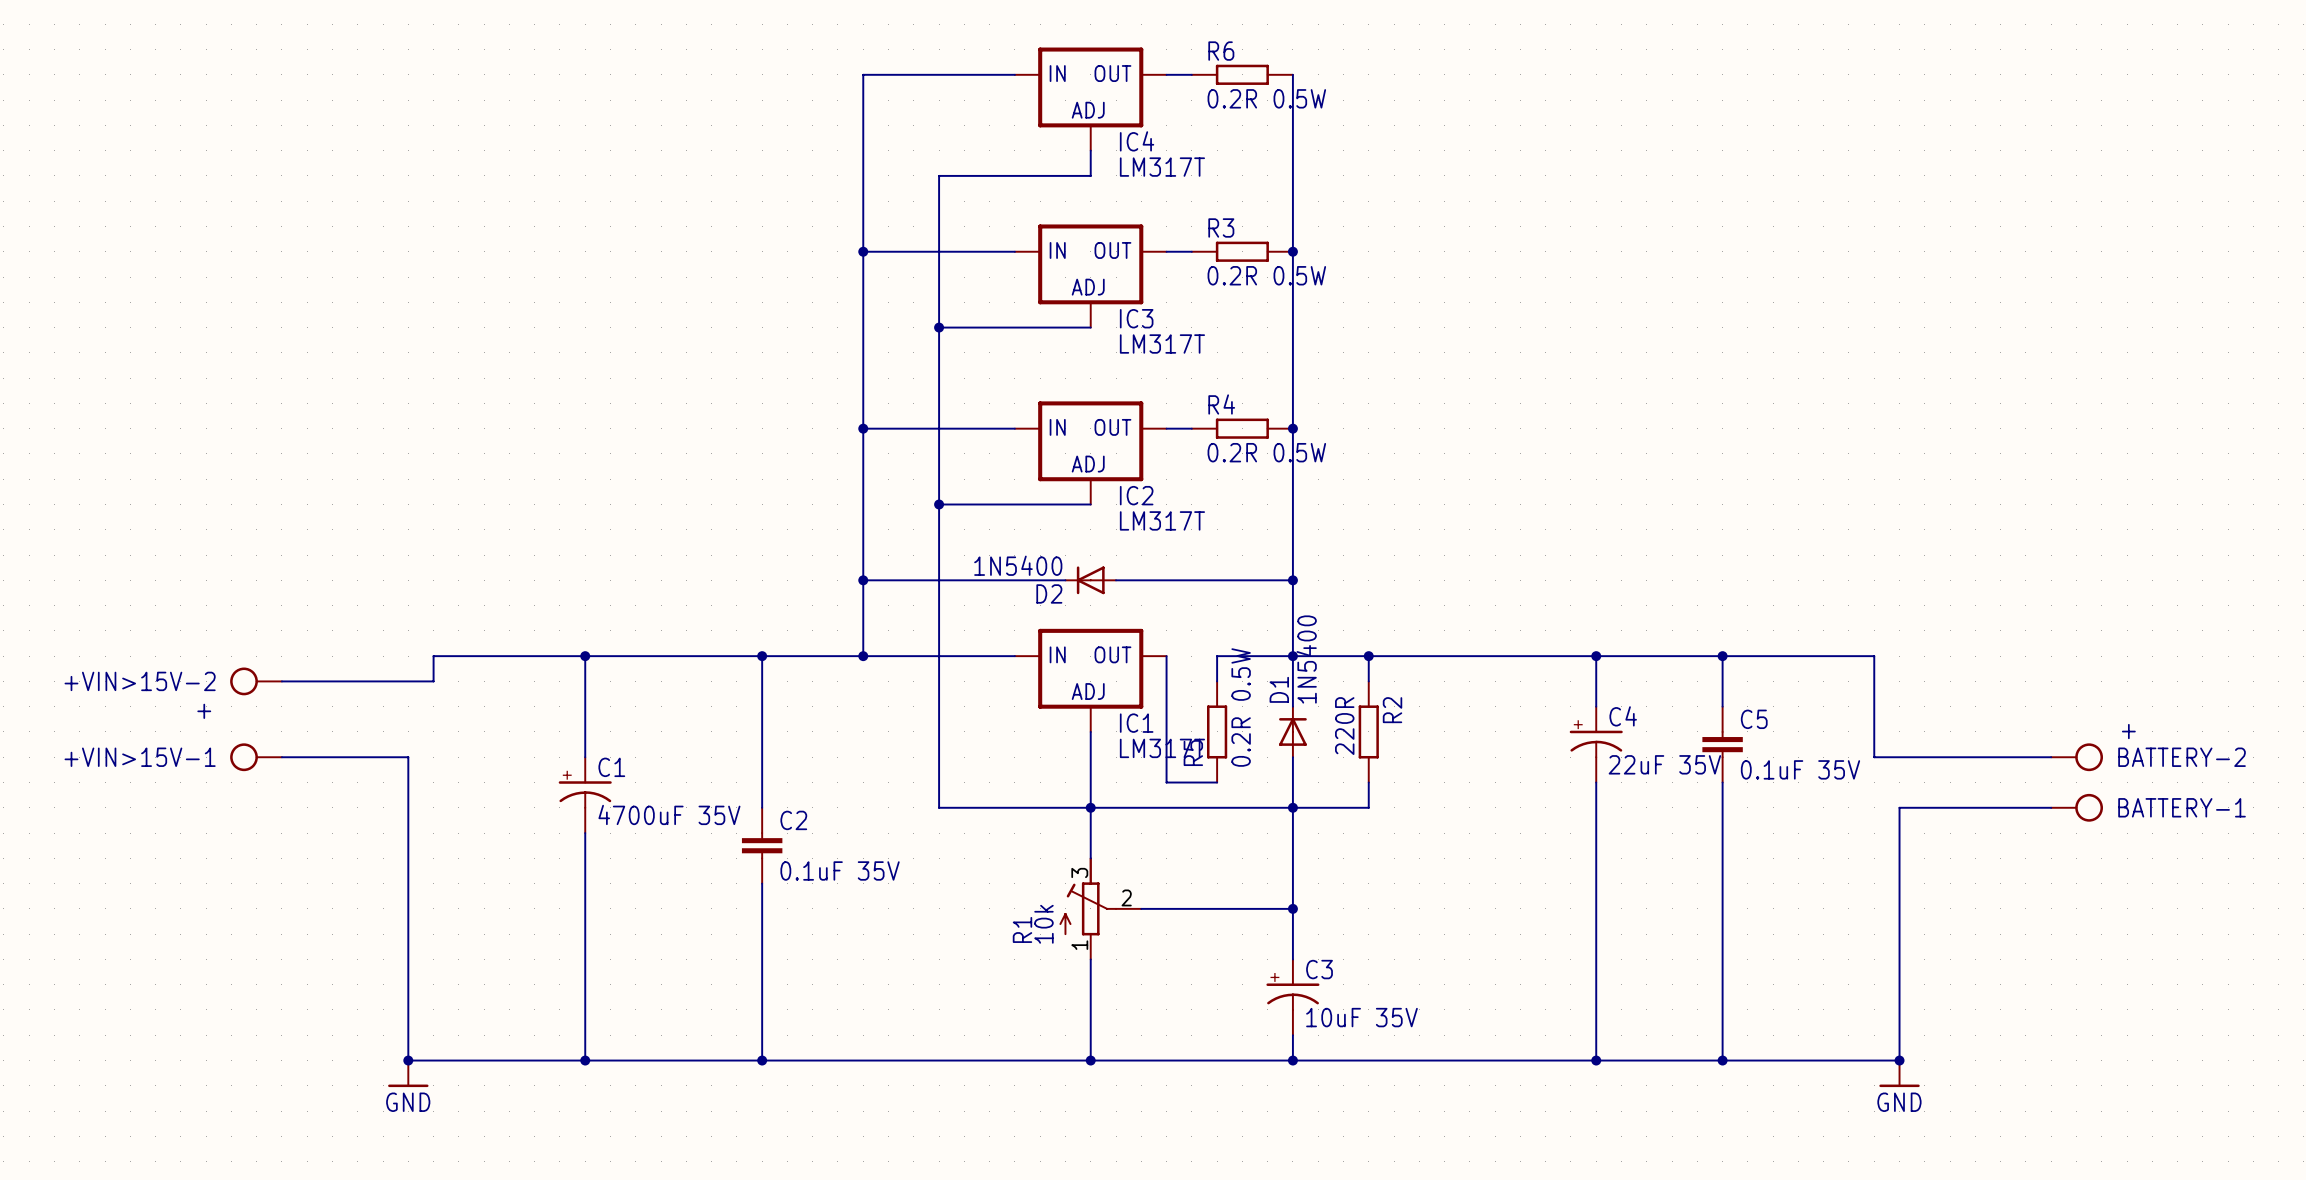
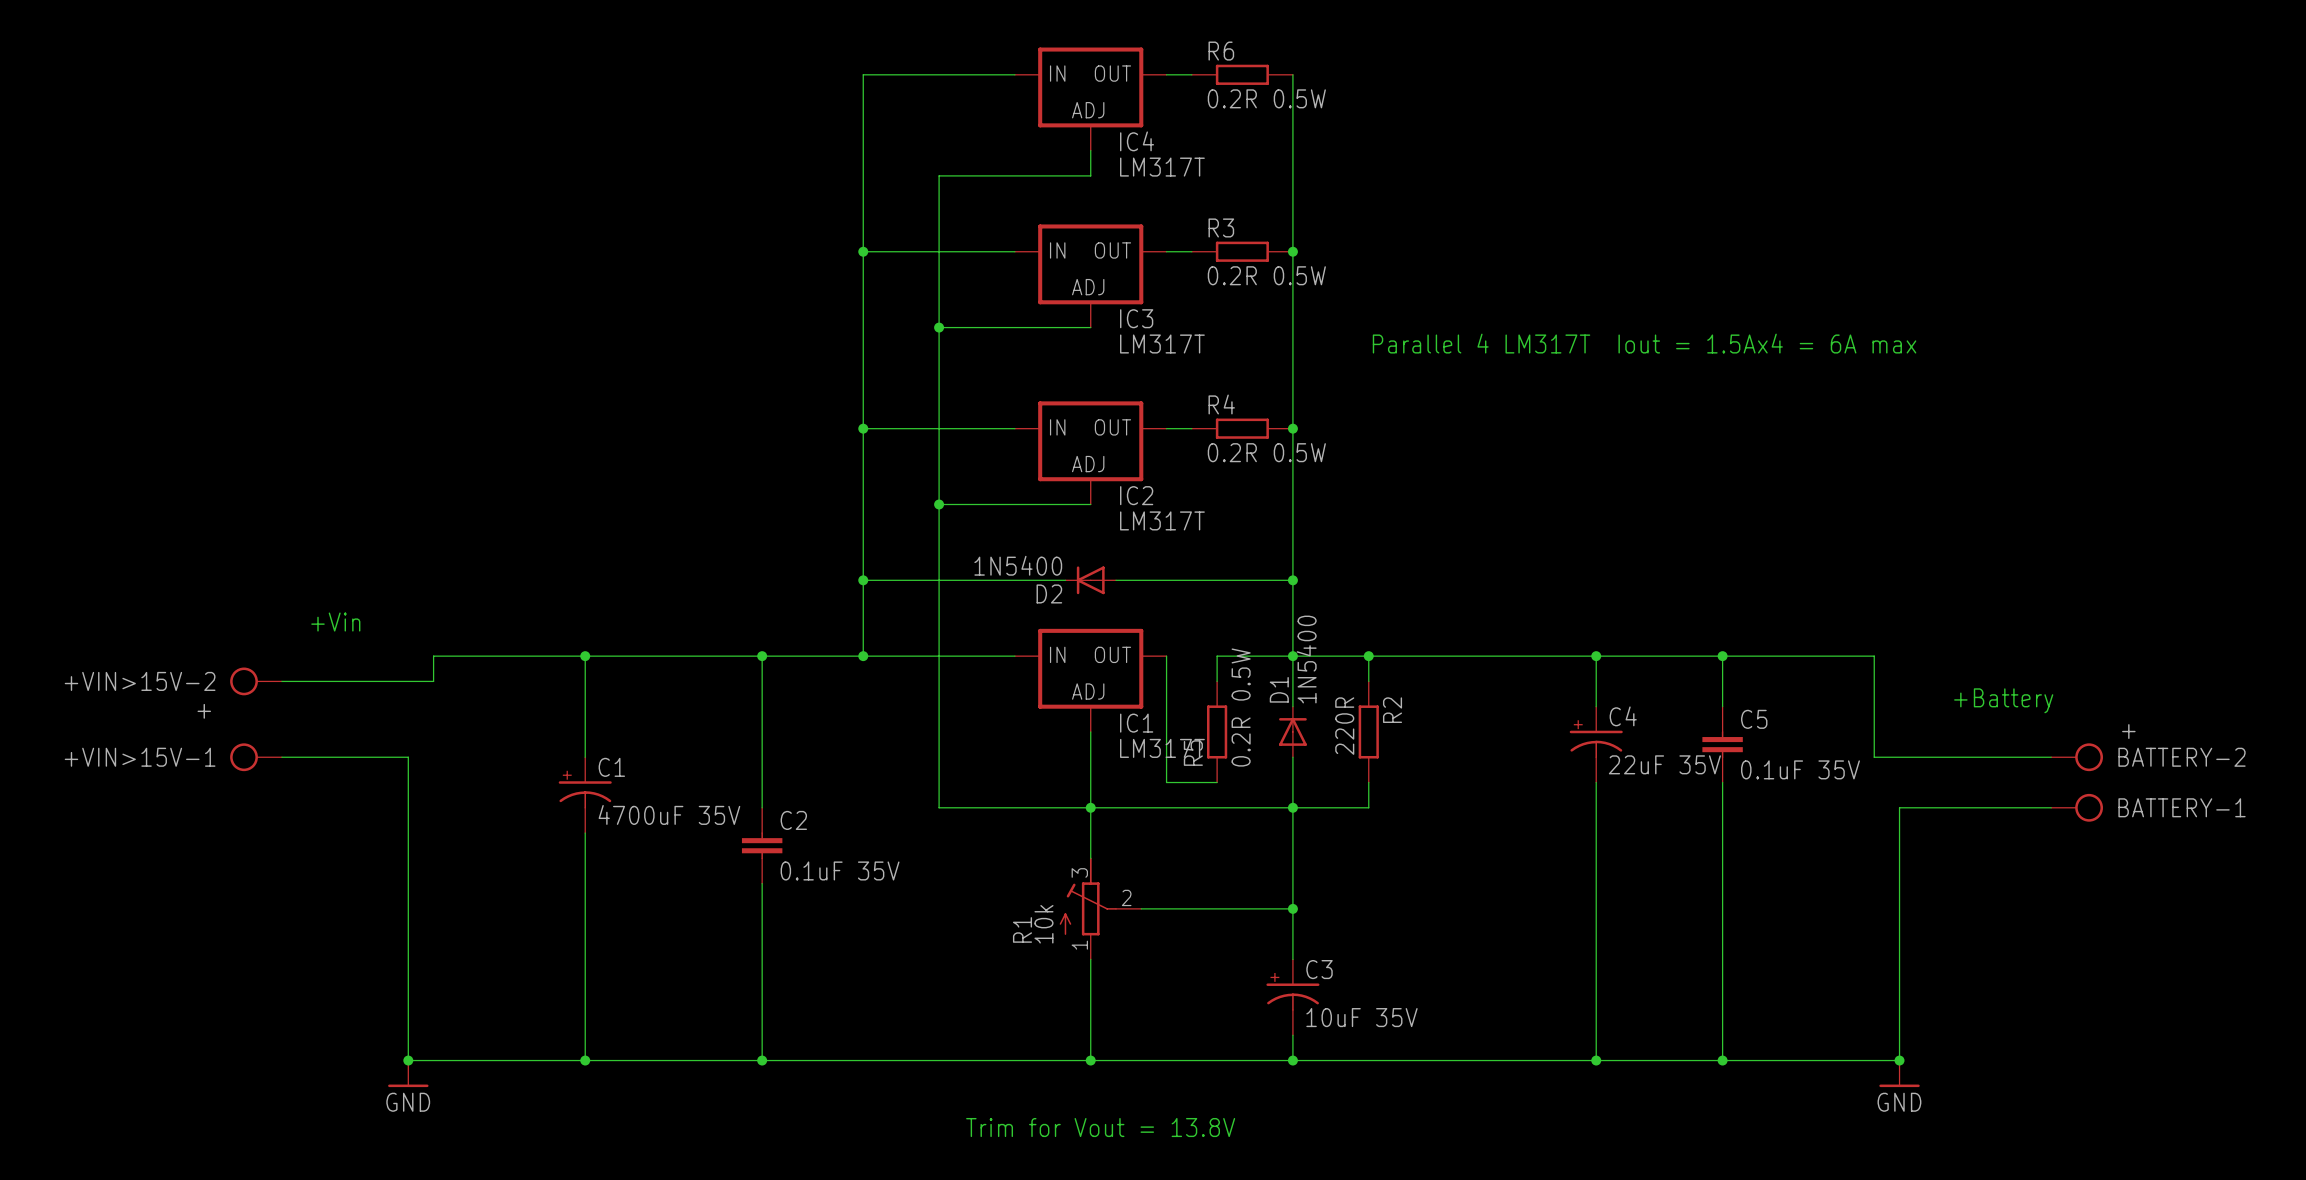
text: none -> Parallel 4 LM317T Iout = 1.5Ax4 = 6A max (1644, 343)
text: none -> +Vin (335, 622)
text: none -> +Battery (2003, 700)
text: none -> Trim for Vout = 13.8V (1100, 1127)

